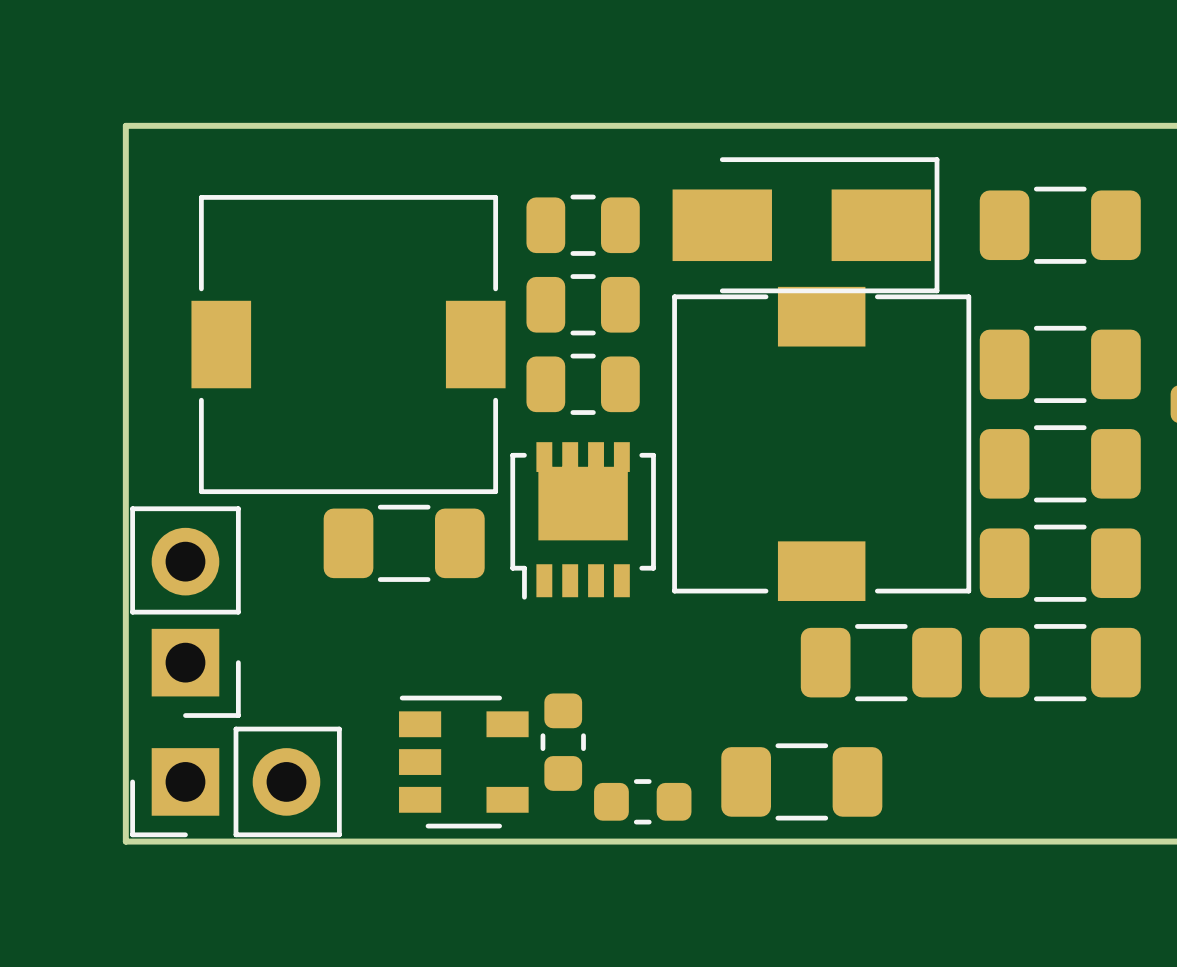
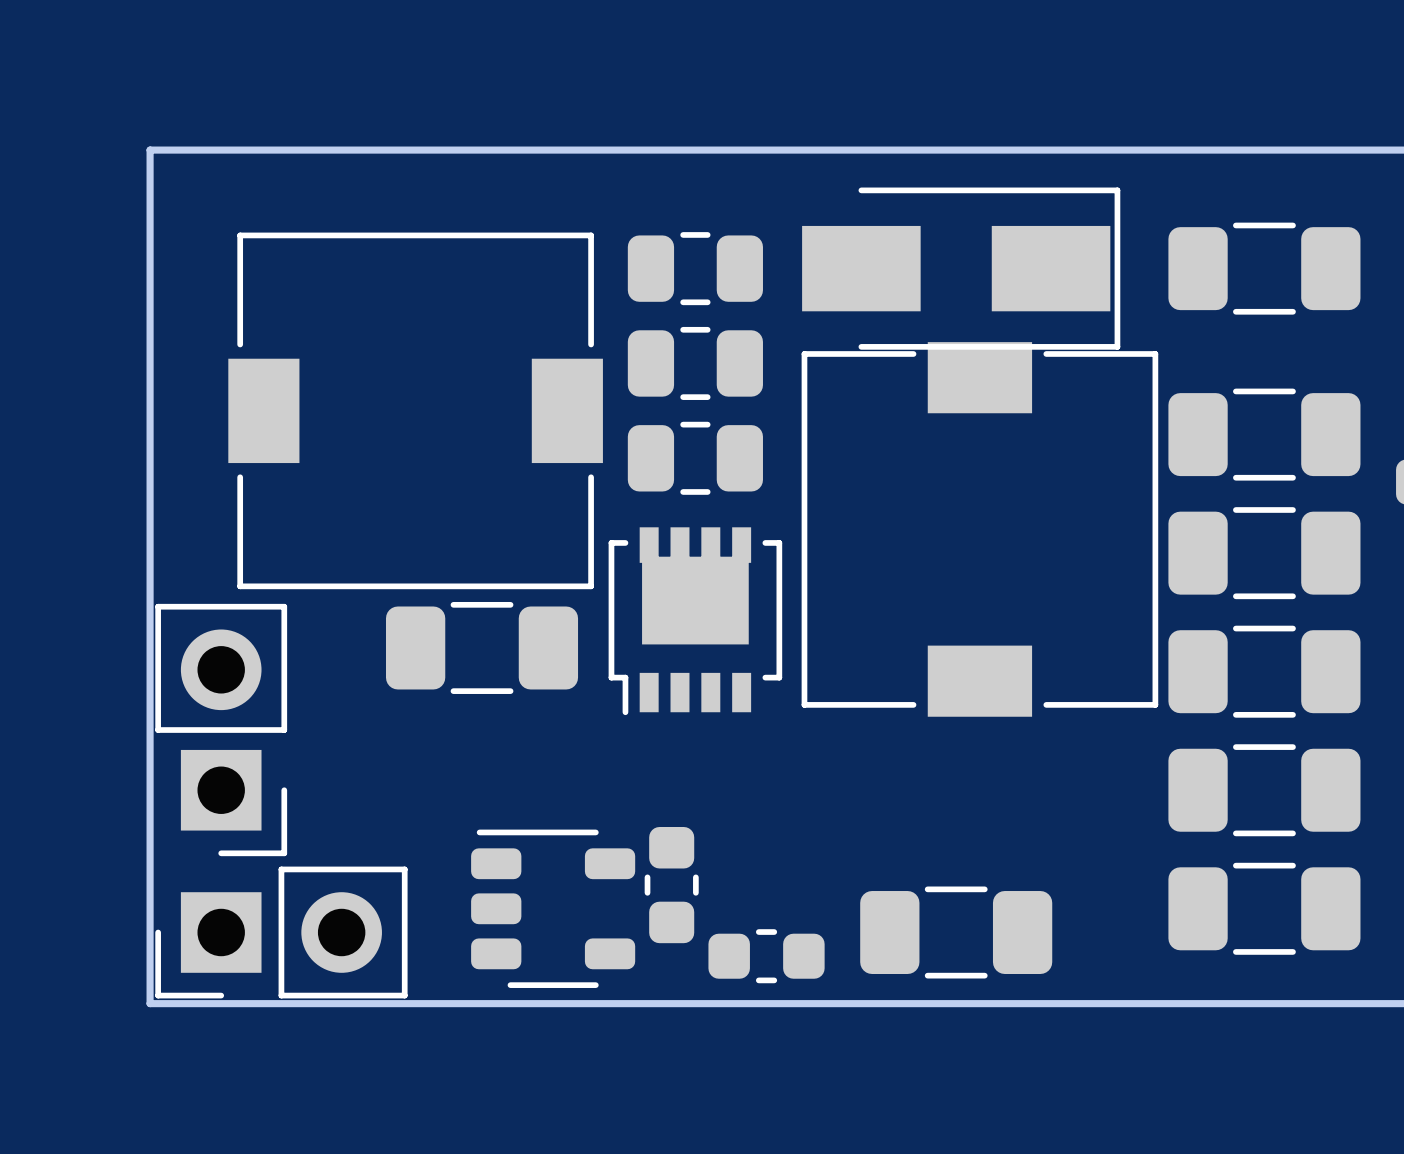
part position: (881, 662) -> (1264, 908)
part footprint: [399, 695, 529, 829] -> [471, 829, 636, 988]

